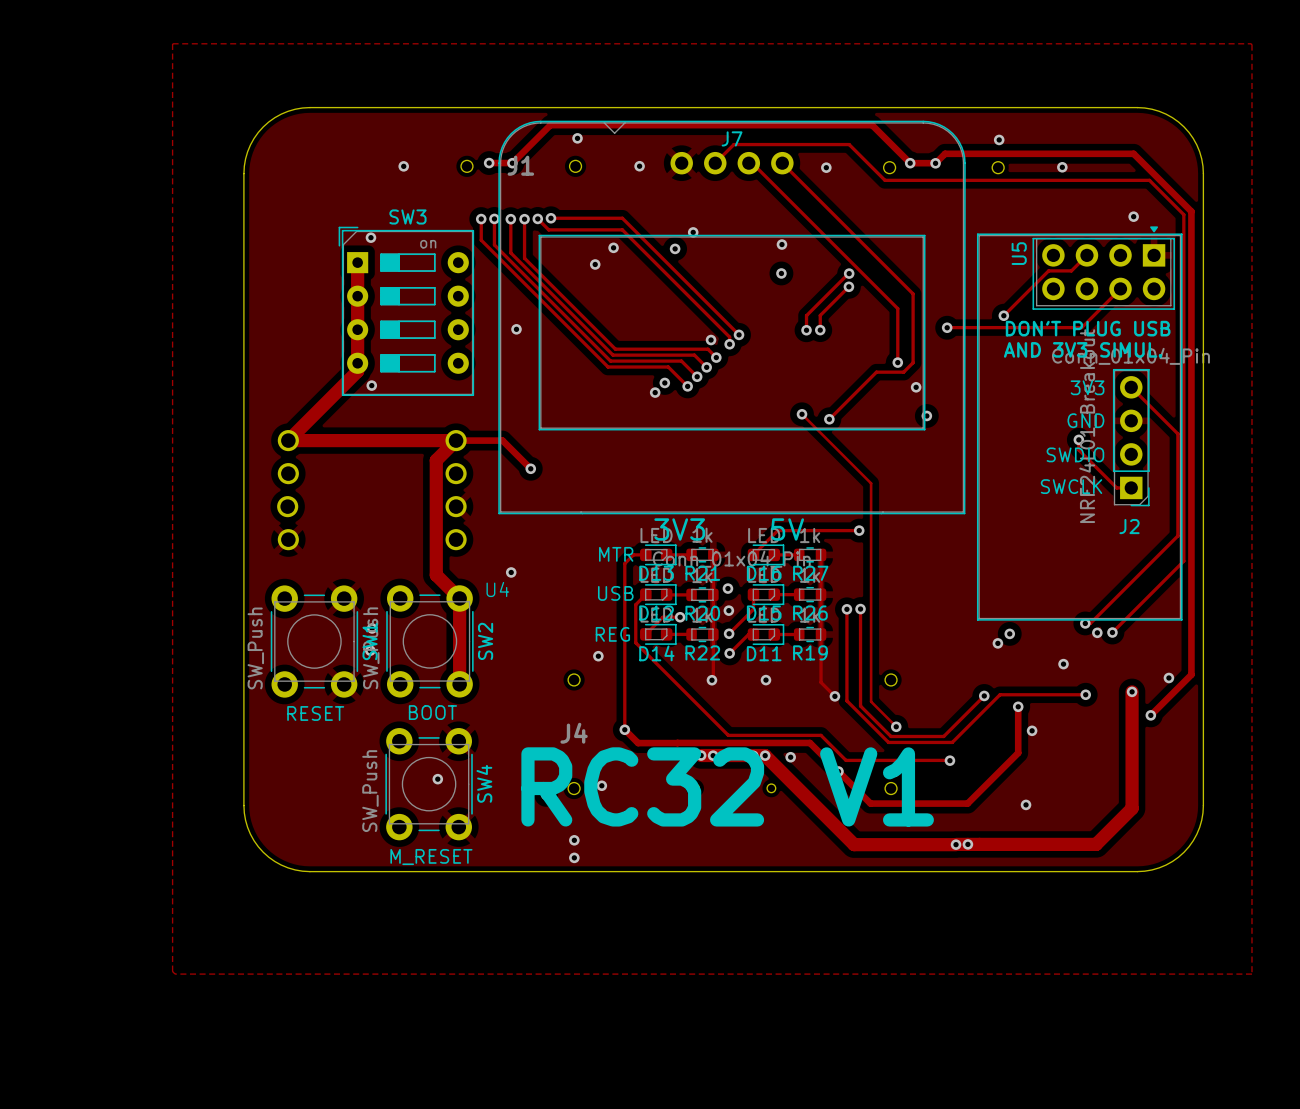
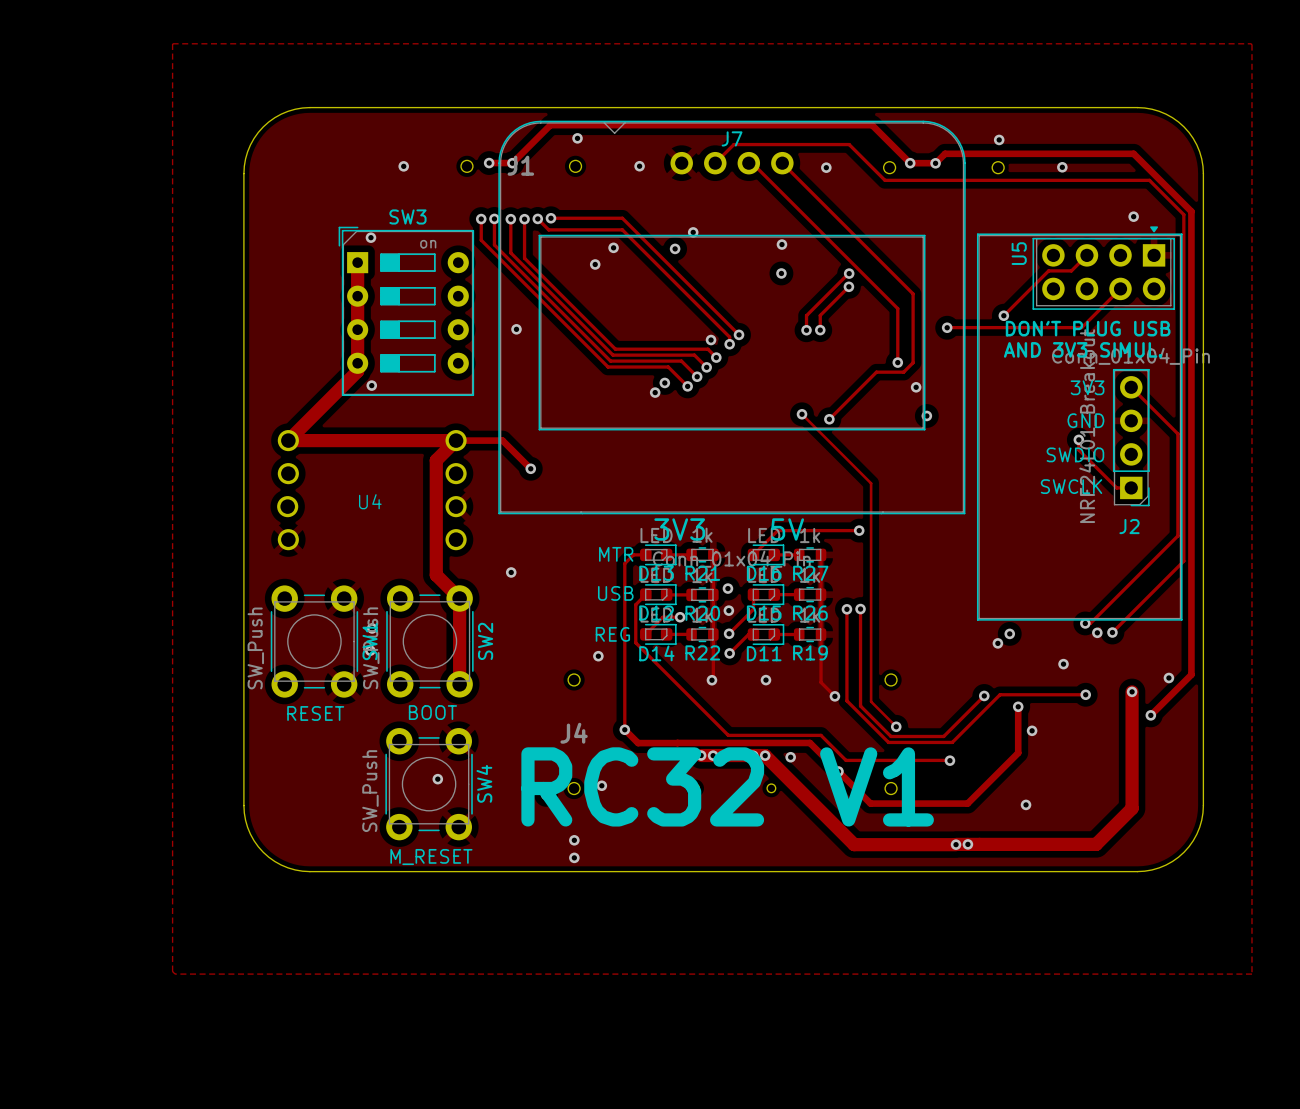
U4 name position: U4 (497, 589) -> U4 (370, 501)

